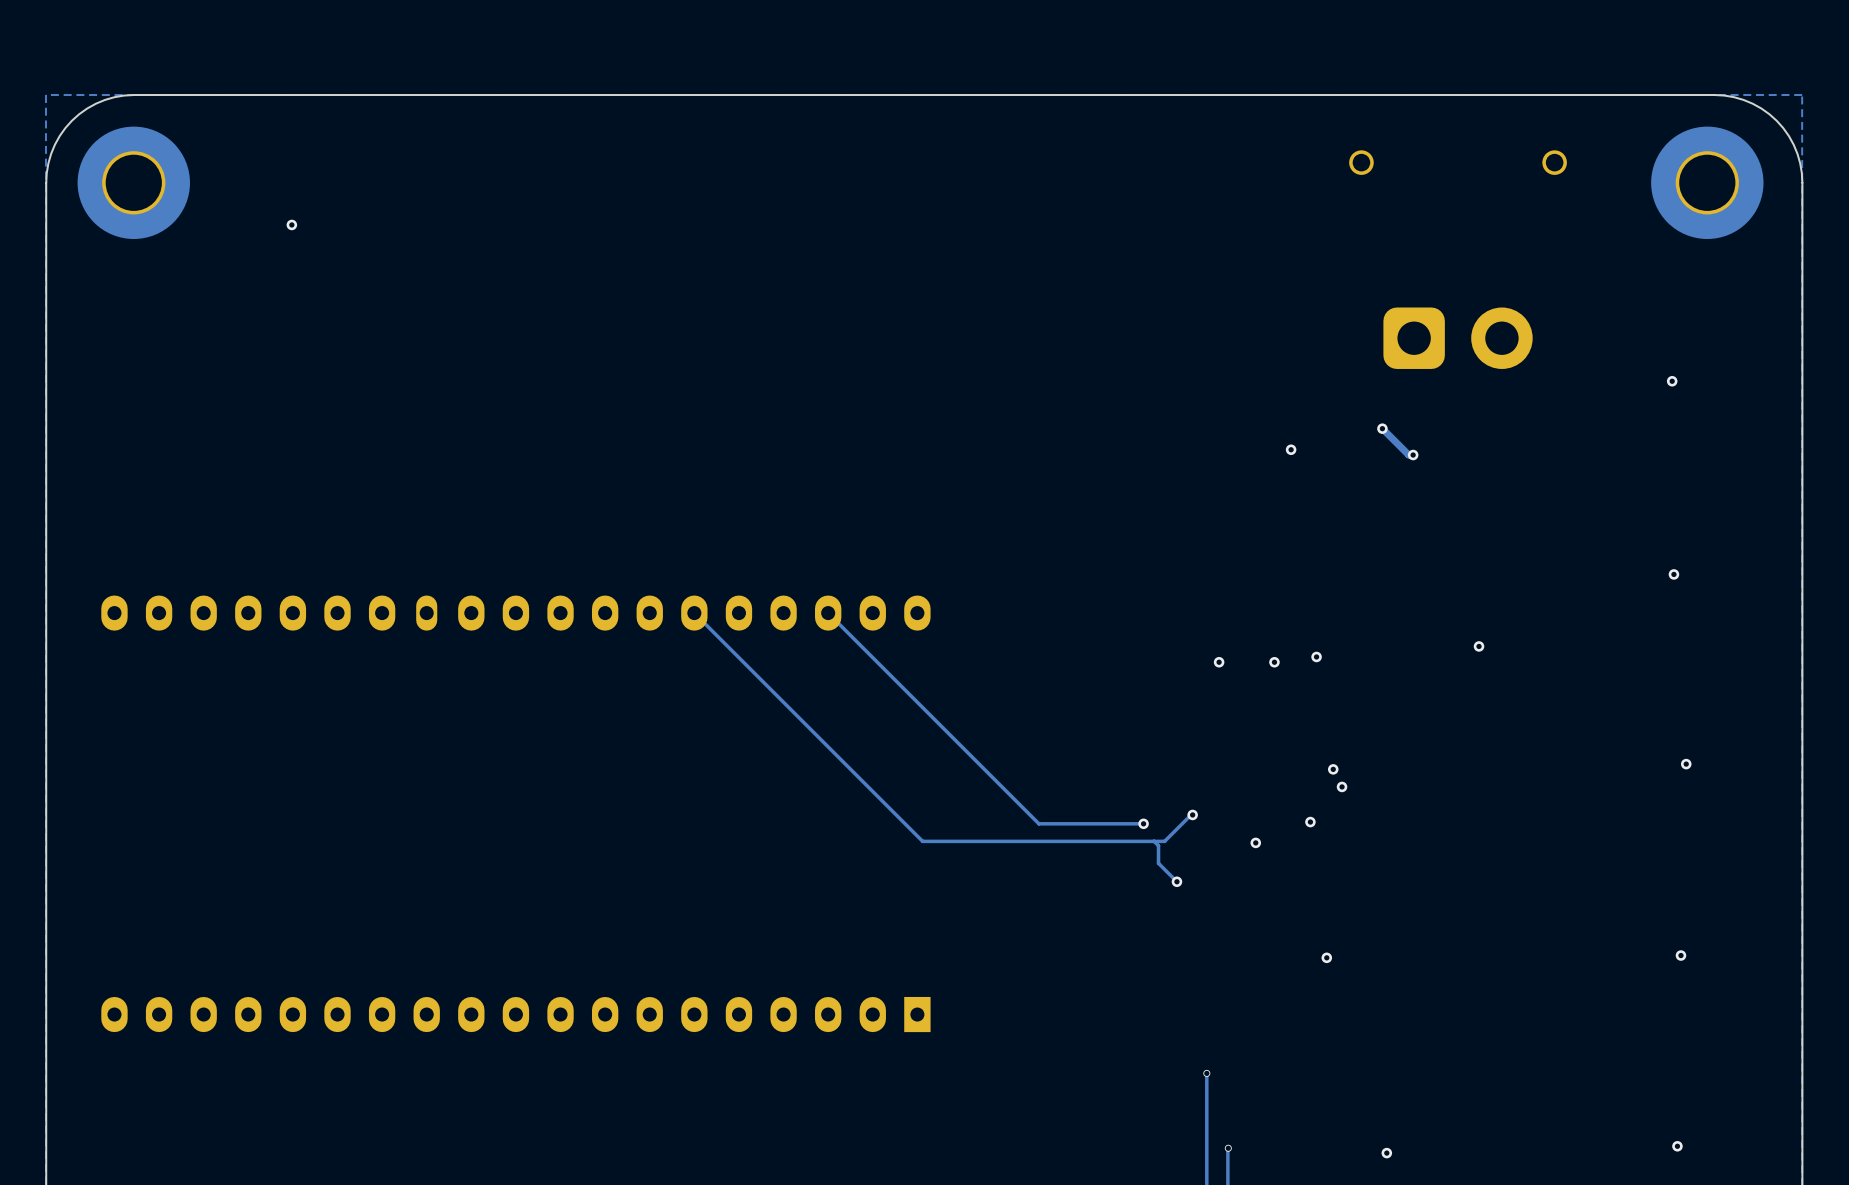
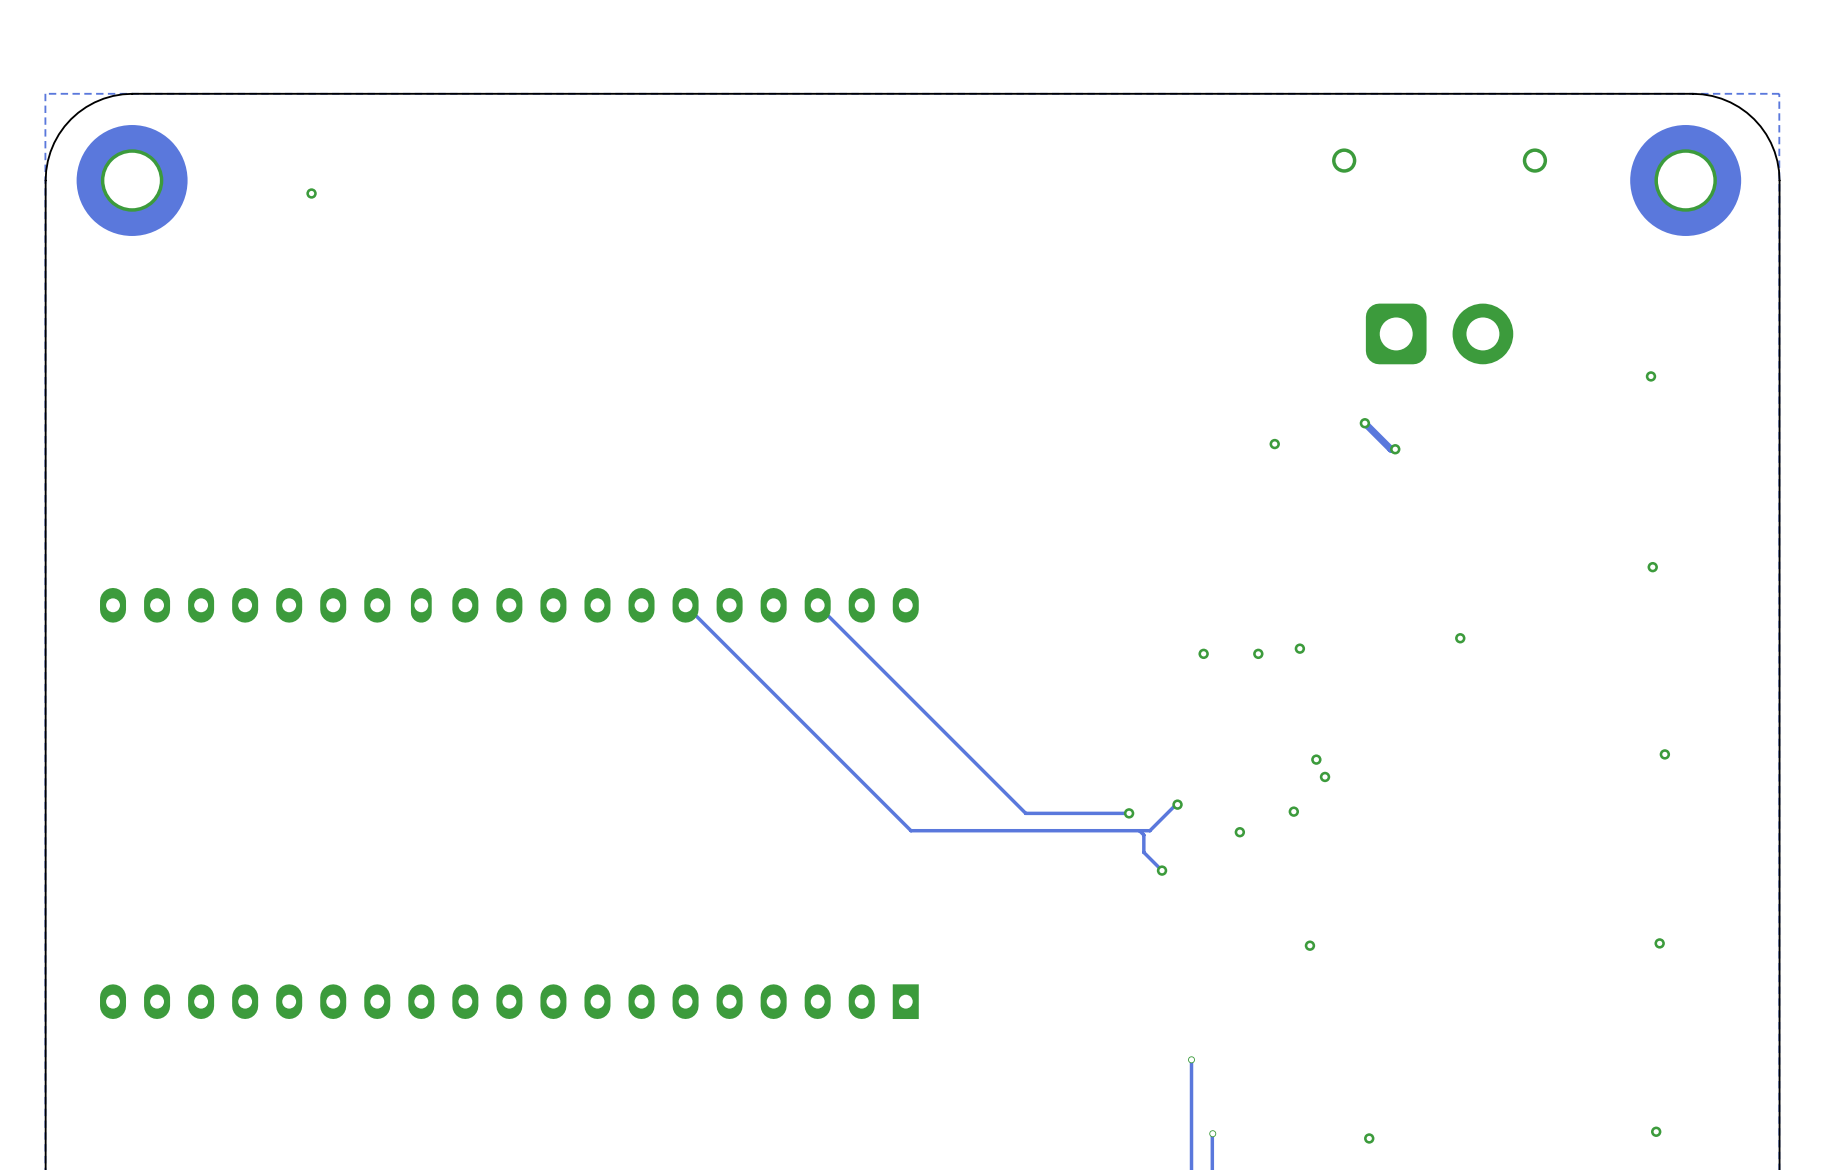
via position: (291, 224) -> (311, 193)

